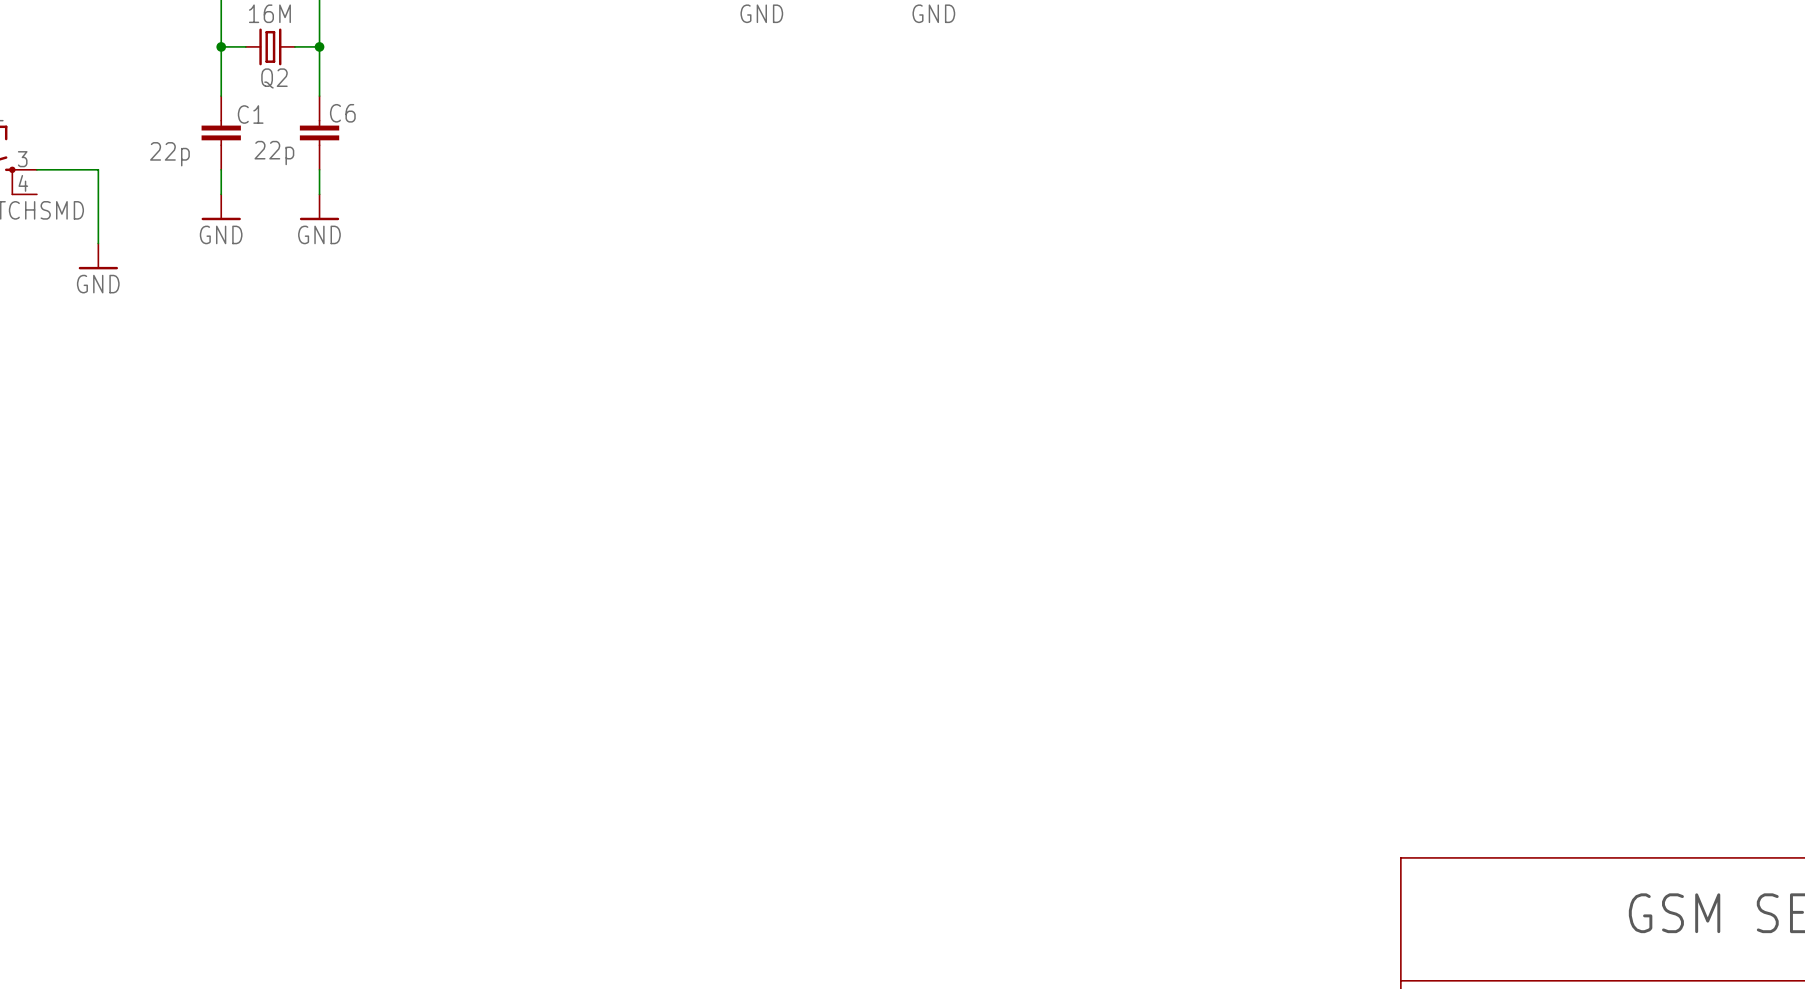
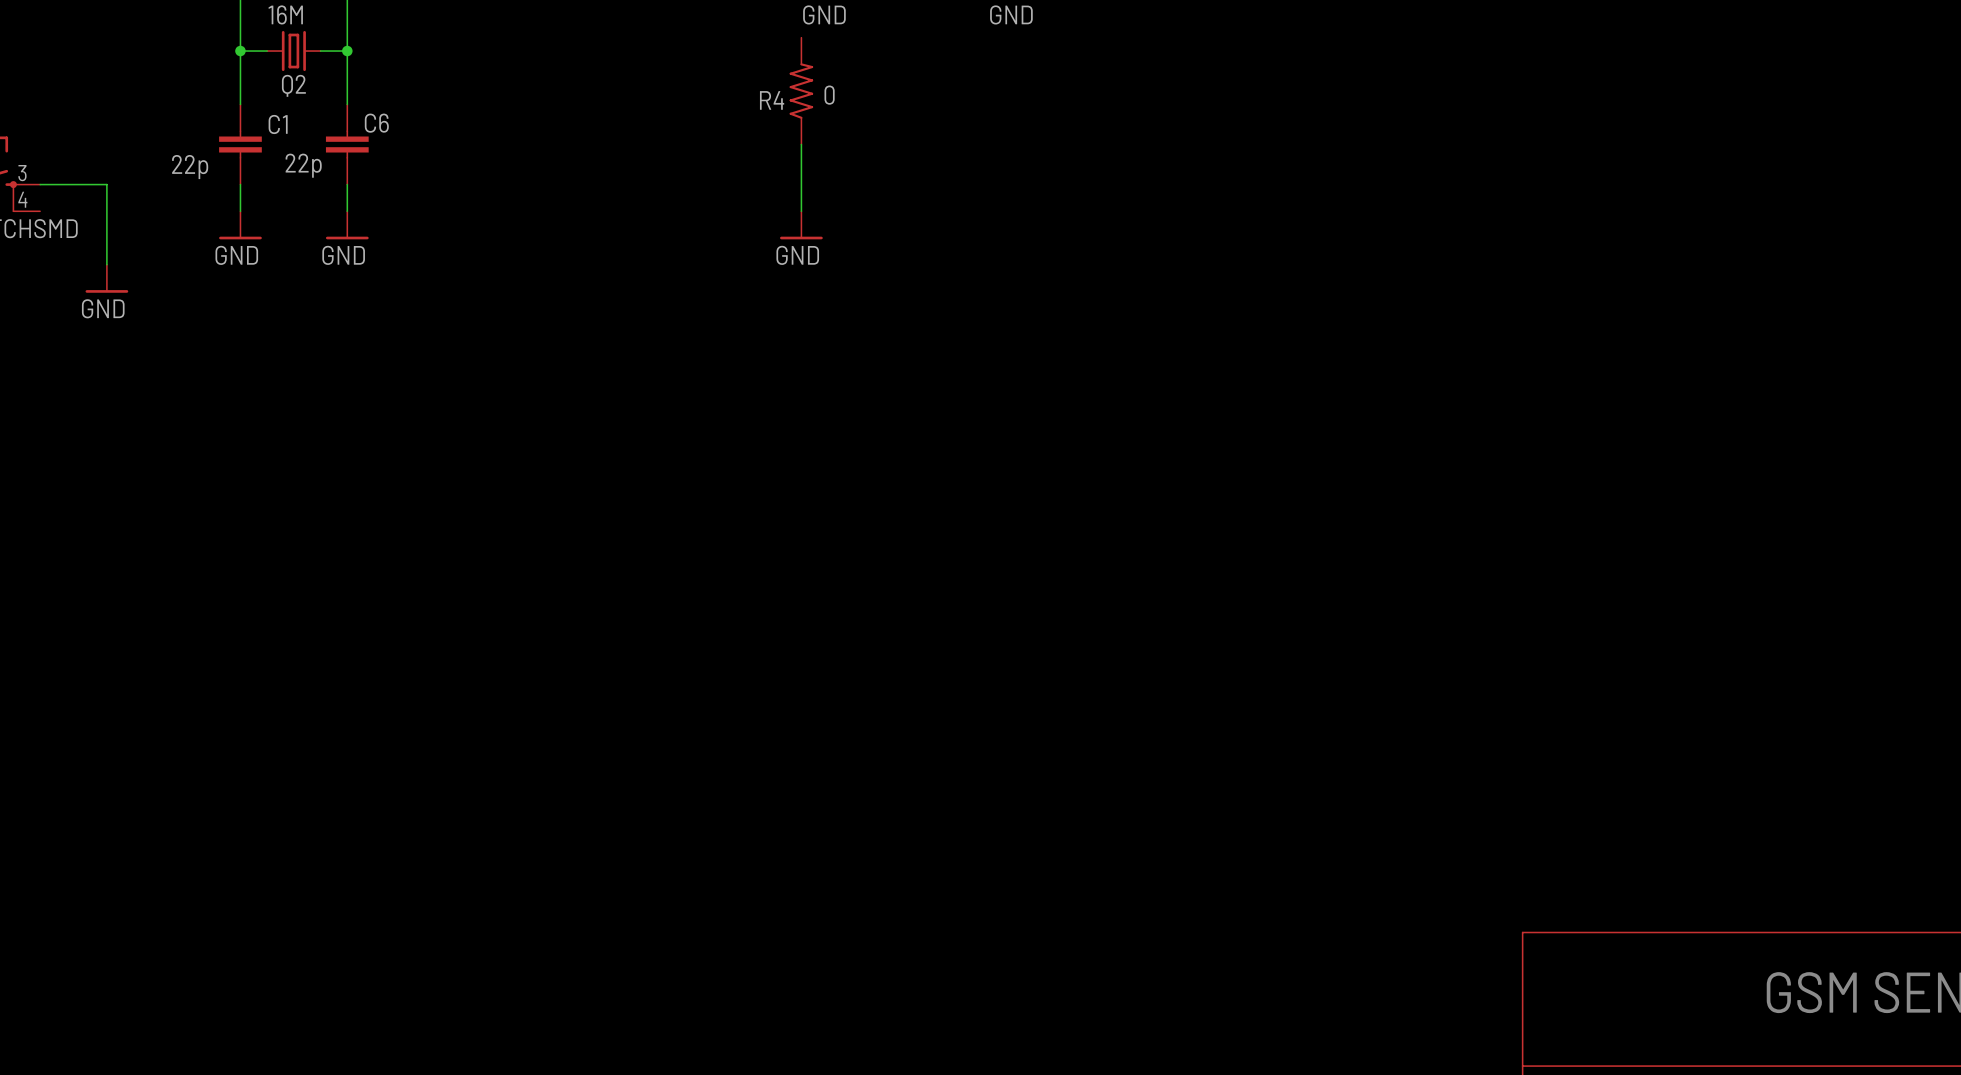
R4: none -> 0 (801, 91)
wire: none -> (801, 144) (801, 211)
power symbol: none -> GND (801, 225)

